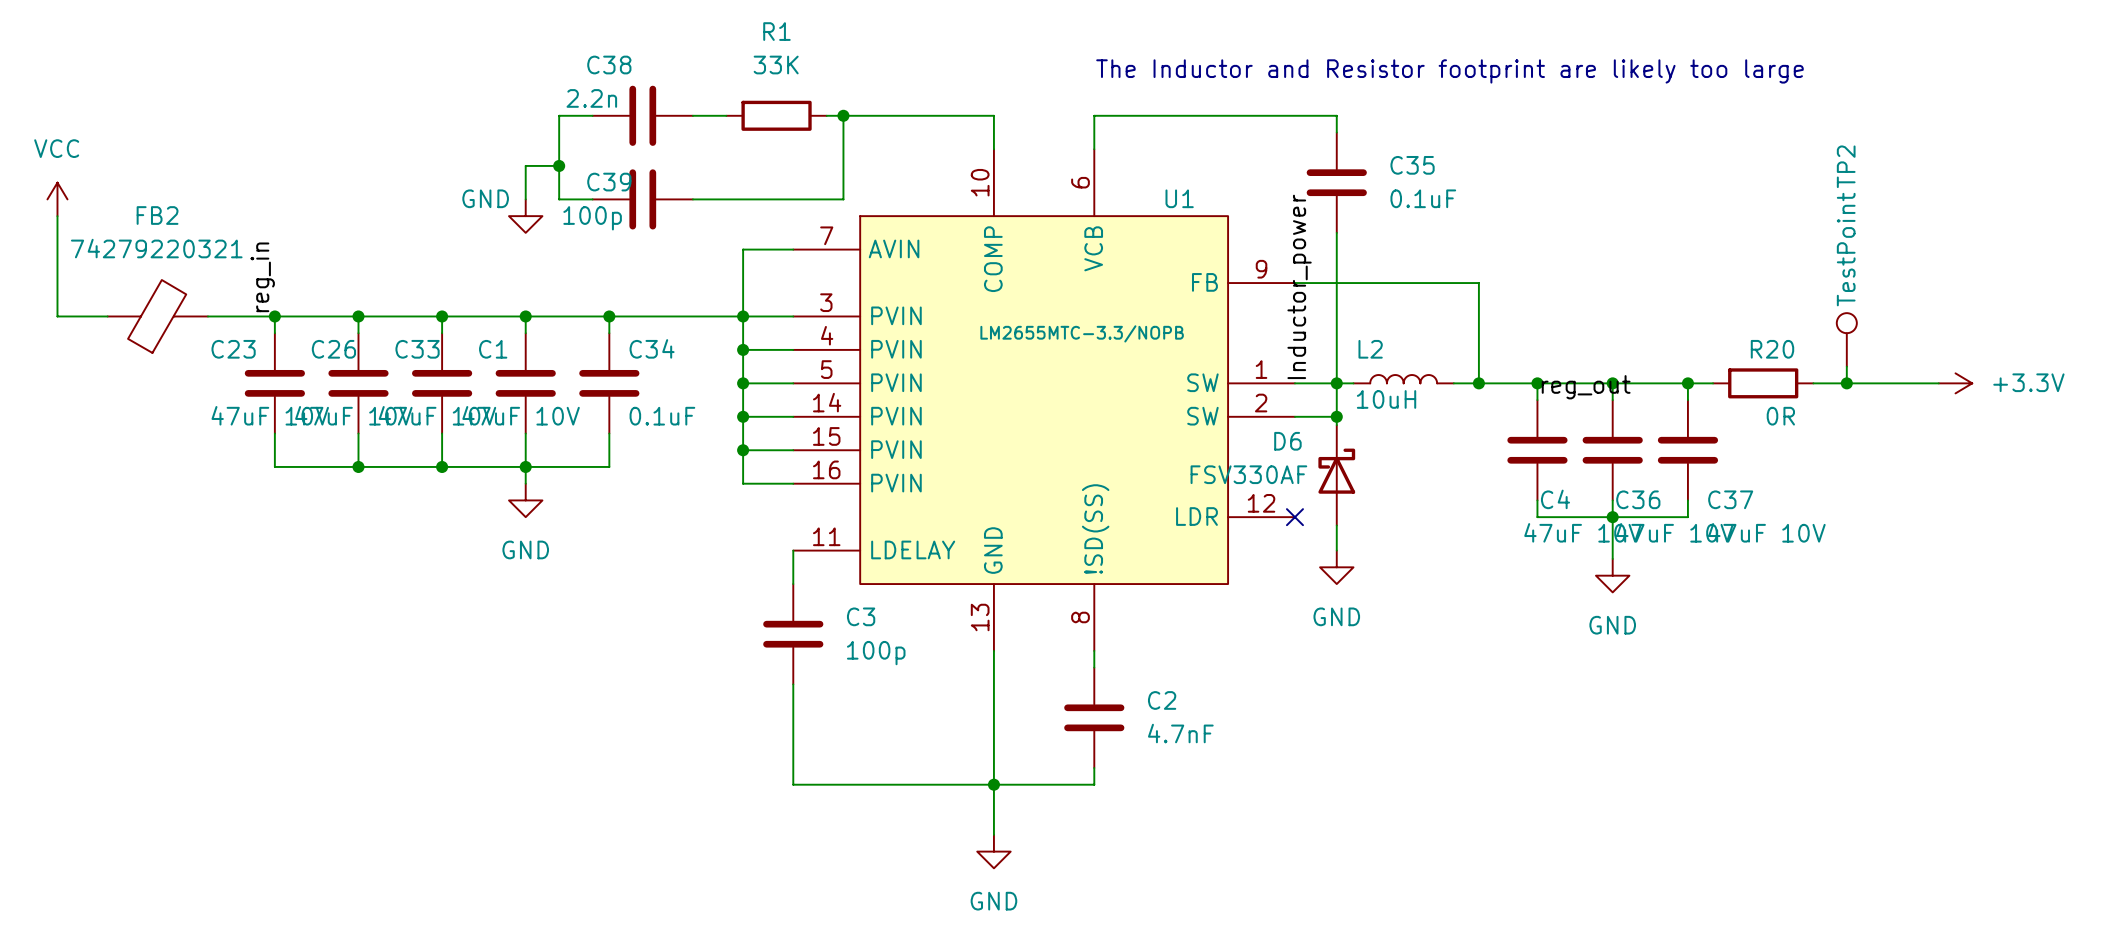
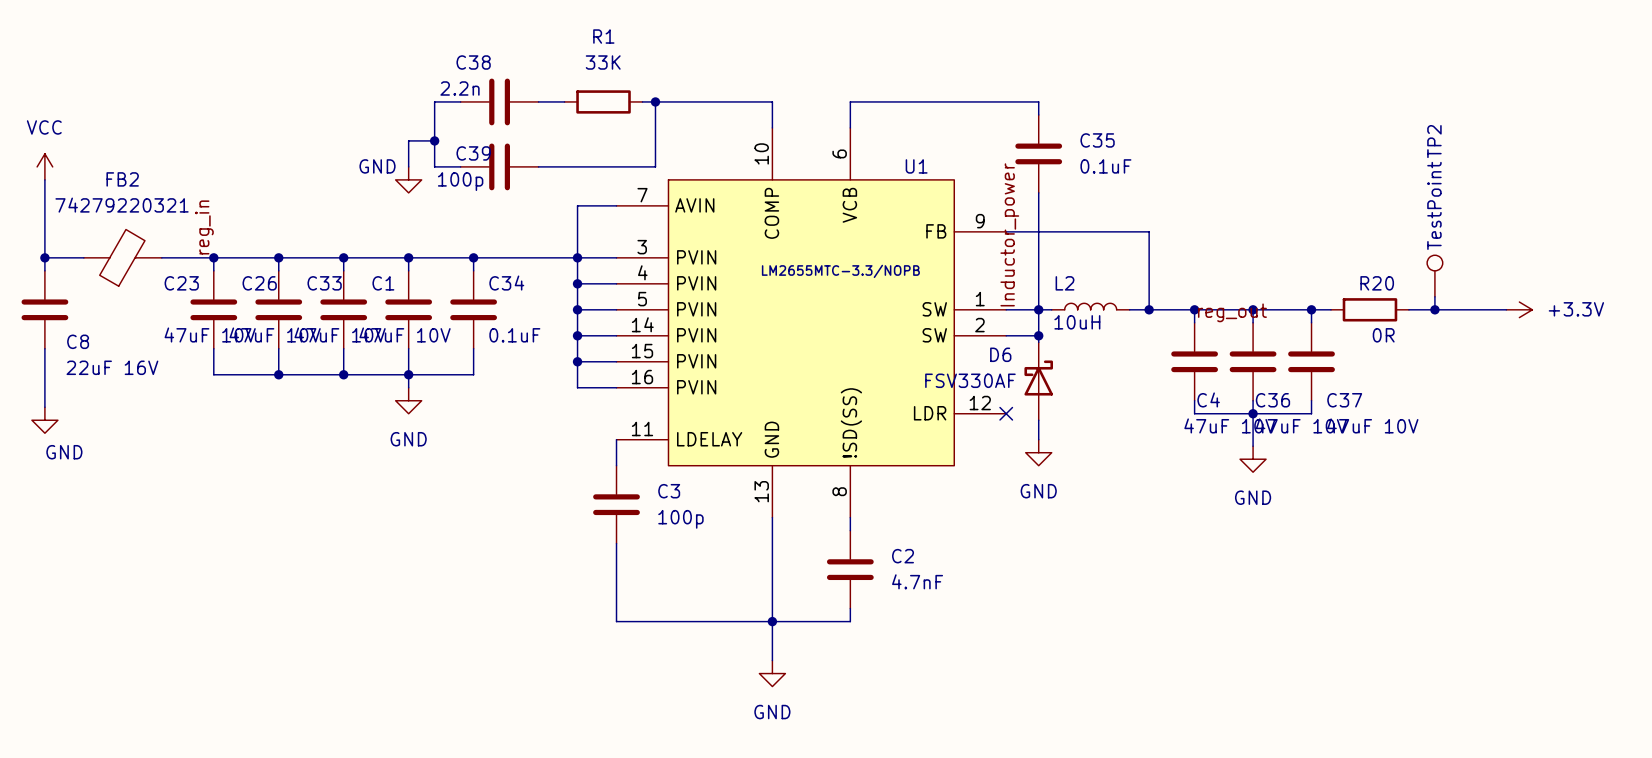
text: The Inductor and Resistor footprint are likely too large (1449, 71) -> none
wire: none -> (44, 257) (44, 270)
junction: none -> (44, 257)
C8: none -> 22uF 16V (44, 309)
wire: none -> (44, 348) (44, 407)
power symbol: none -> GND (44, 420)

